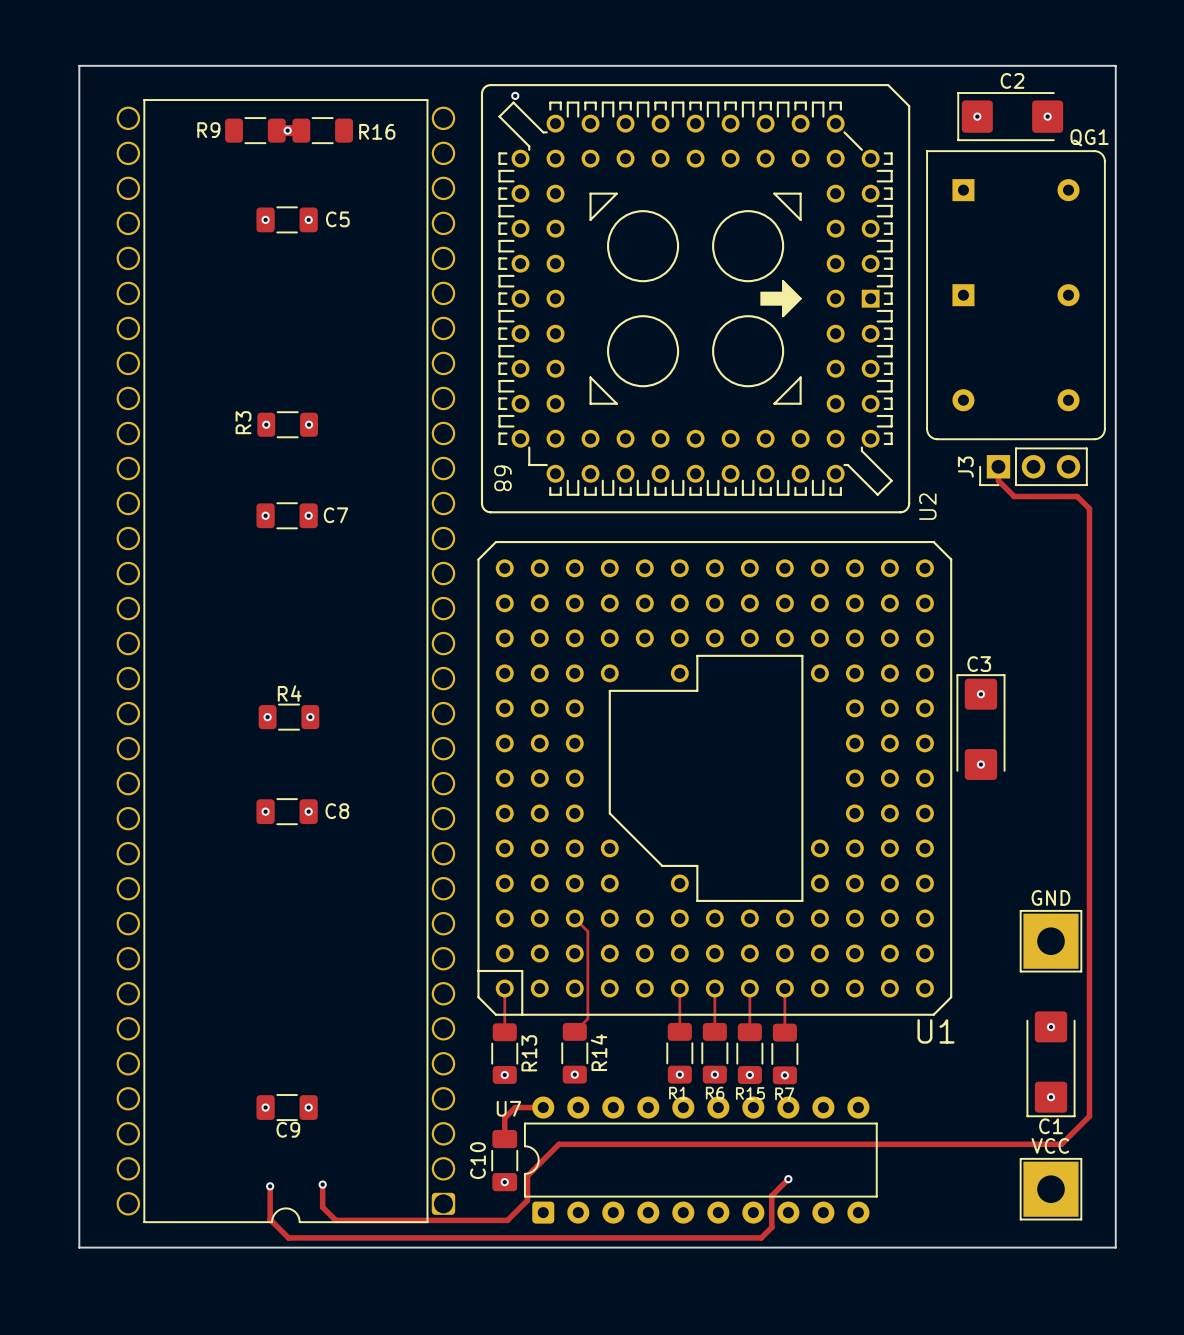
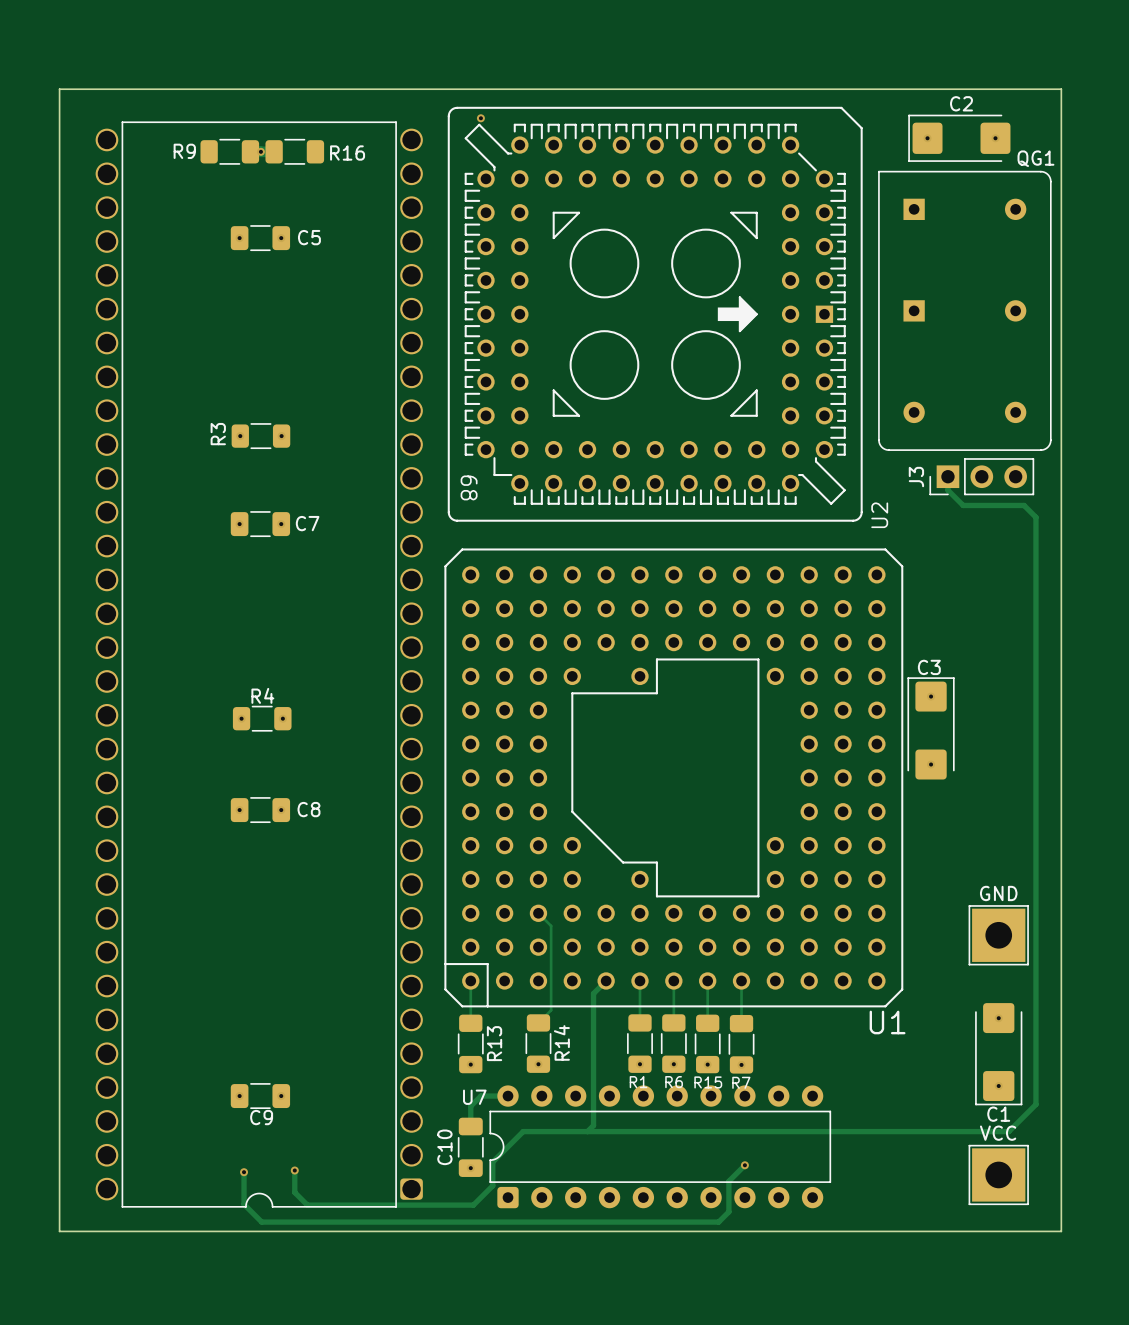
track: none -> (606, 980) (593, 993) (593, 1125) (587, 1131)

